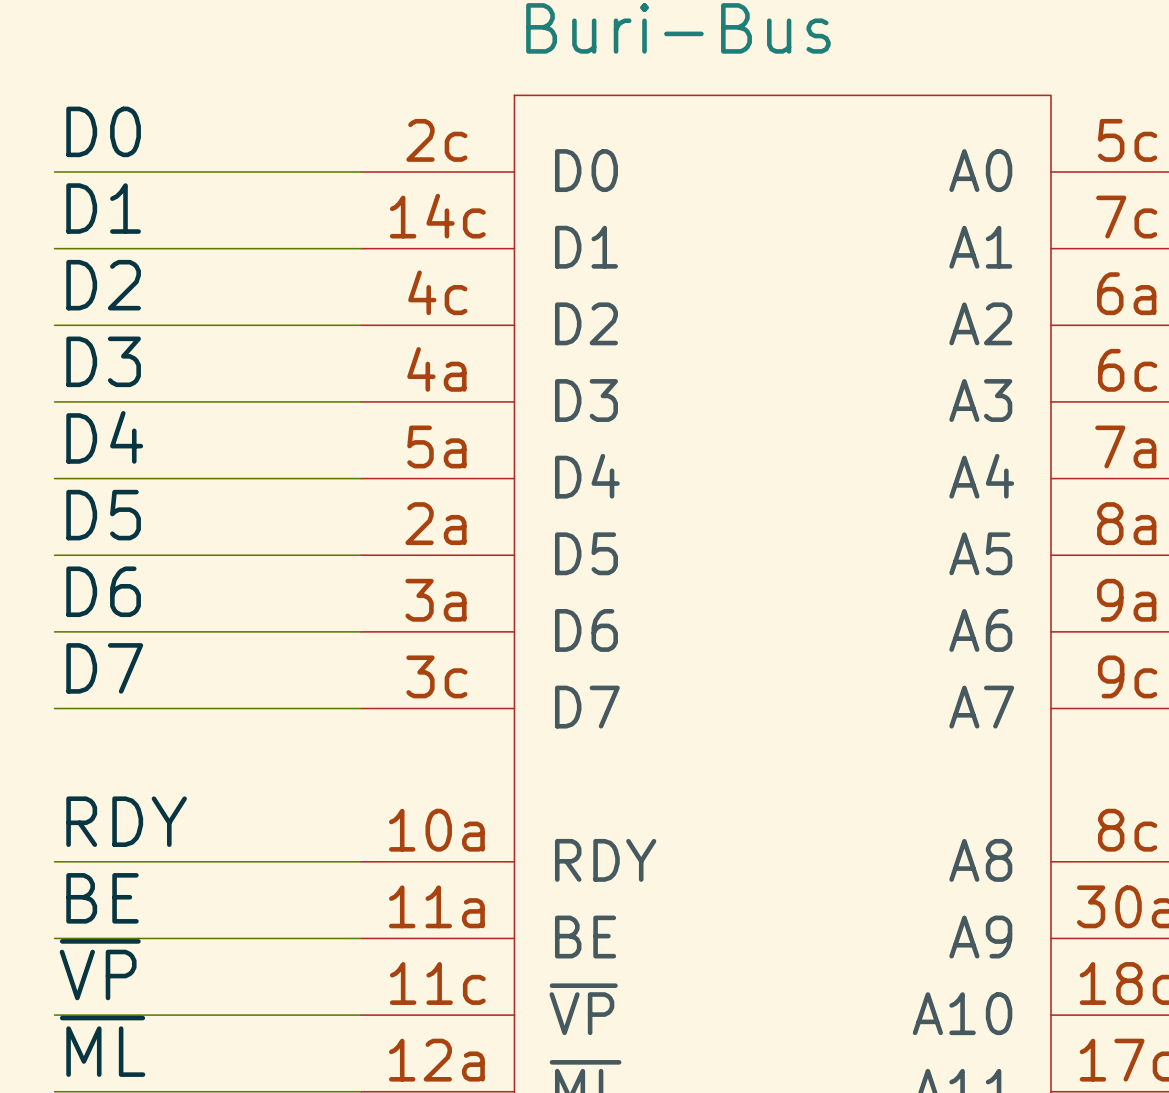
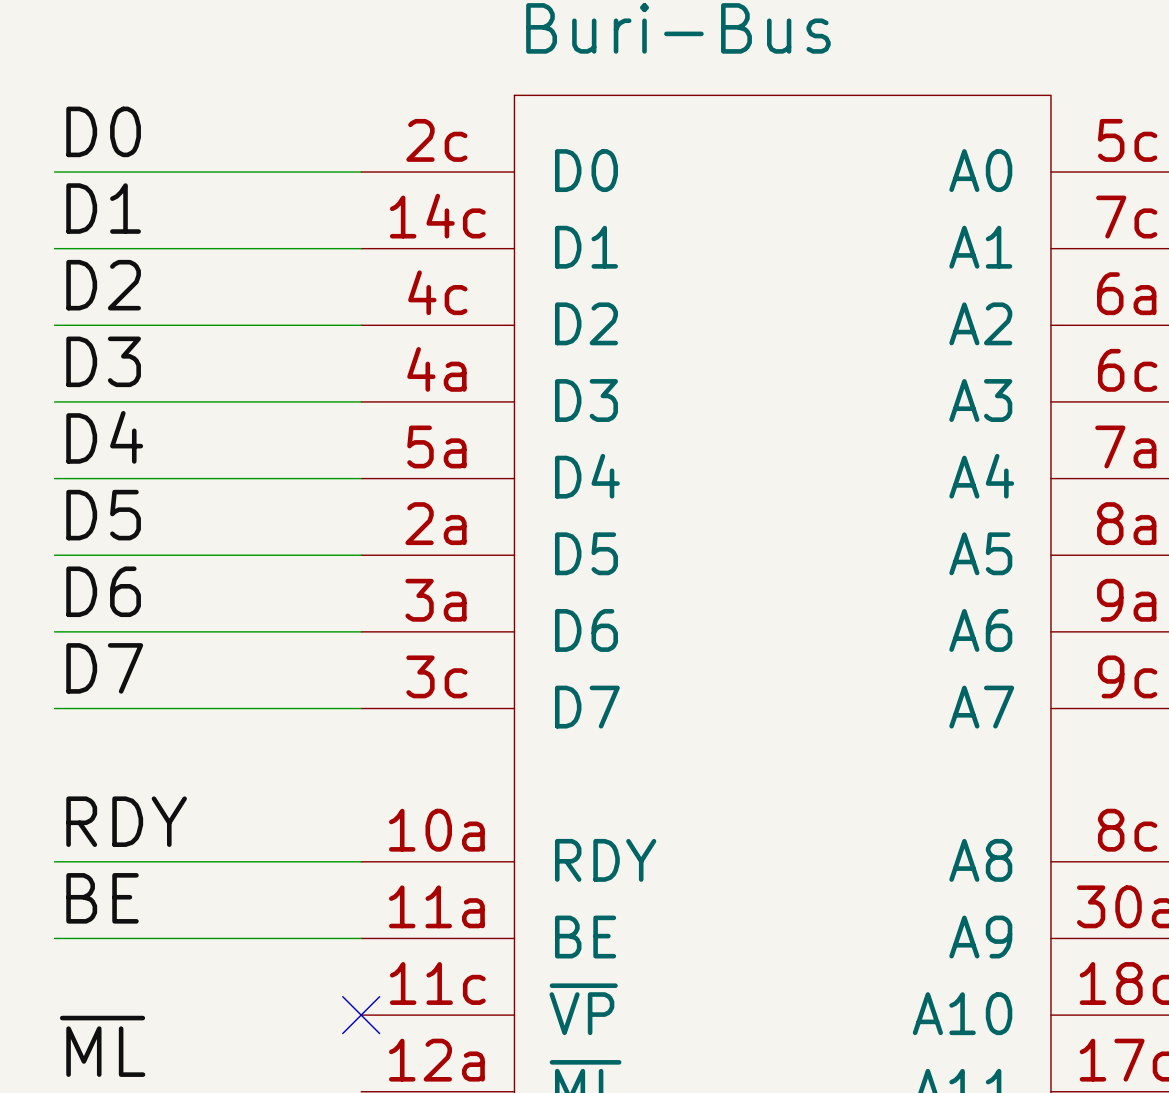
label: ~{VP} (100, 969) -> none
wire: (54, 1015) (361, 1015) -> none
no-connect mark: none -> (361, 1015)
wire: (54, 1091) (361, 1091) -> none

